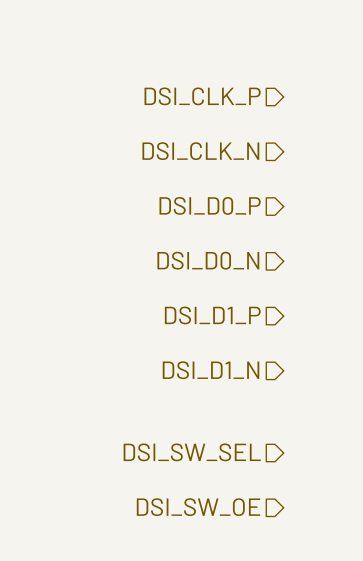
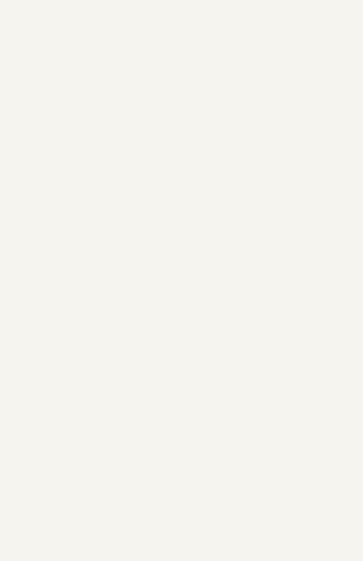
hierarchical label: DSI_CLK_P (202, 96) -> none
hierarchical label: DSI_CLK_N (200, 151) -> none
hierarchical label: DSI_D0_P (210, 205) -> none
hierarchical label: DSI_D0_N (208, 260) -> none
hierarchical label: DSI_D1_P (212, 315) -> none
hierarchical label: DSI_D1_N (211, 370) -> none
hierarchical label: DSI_SW_SEL (192, 452) -> none
hierarchical label: DSI_SW_OE (198, 507) -> none

